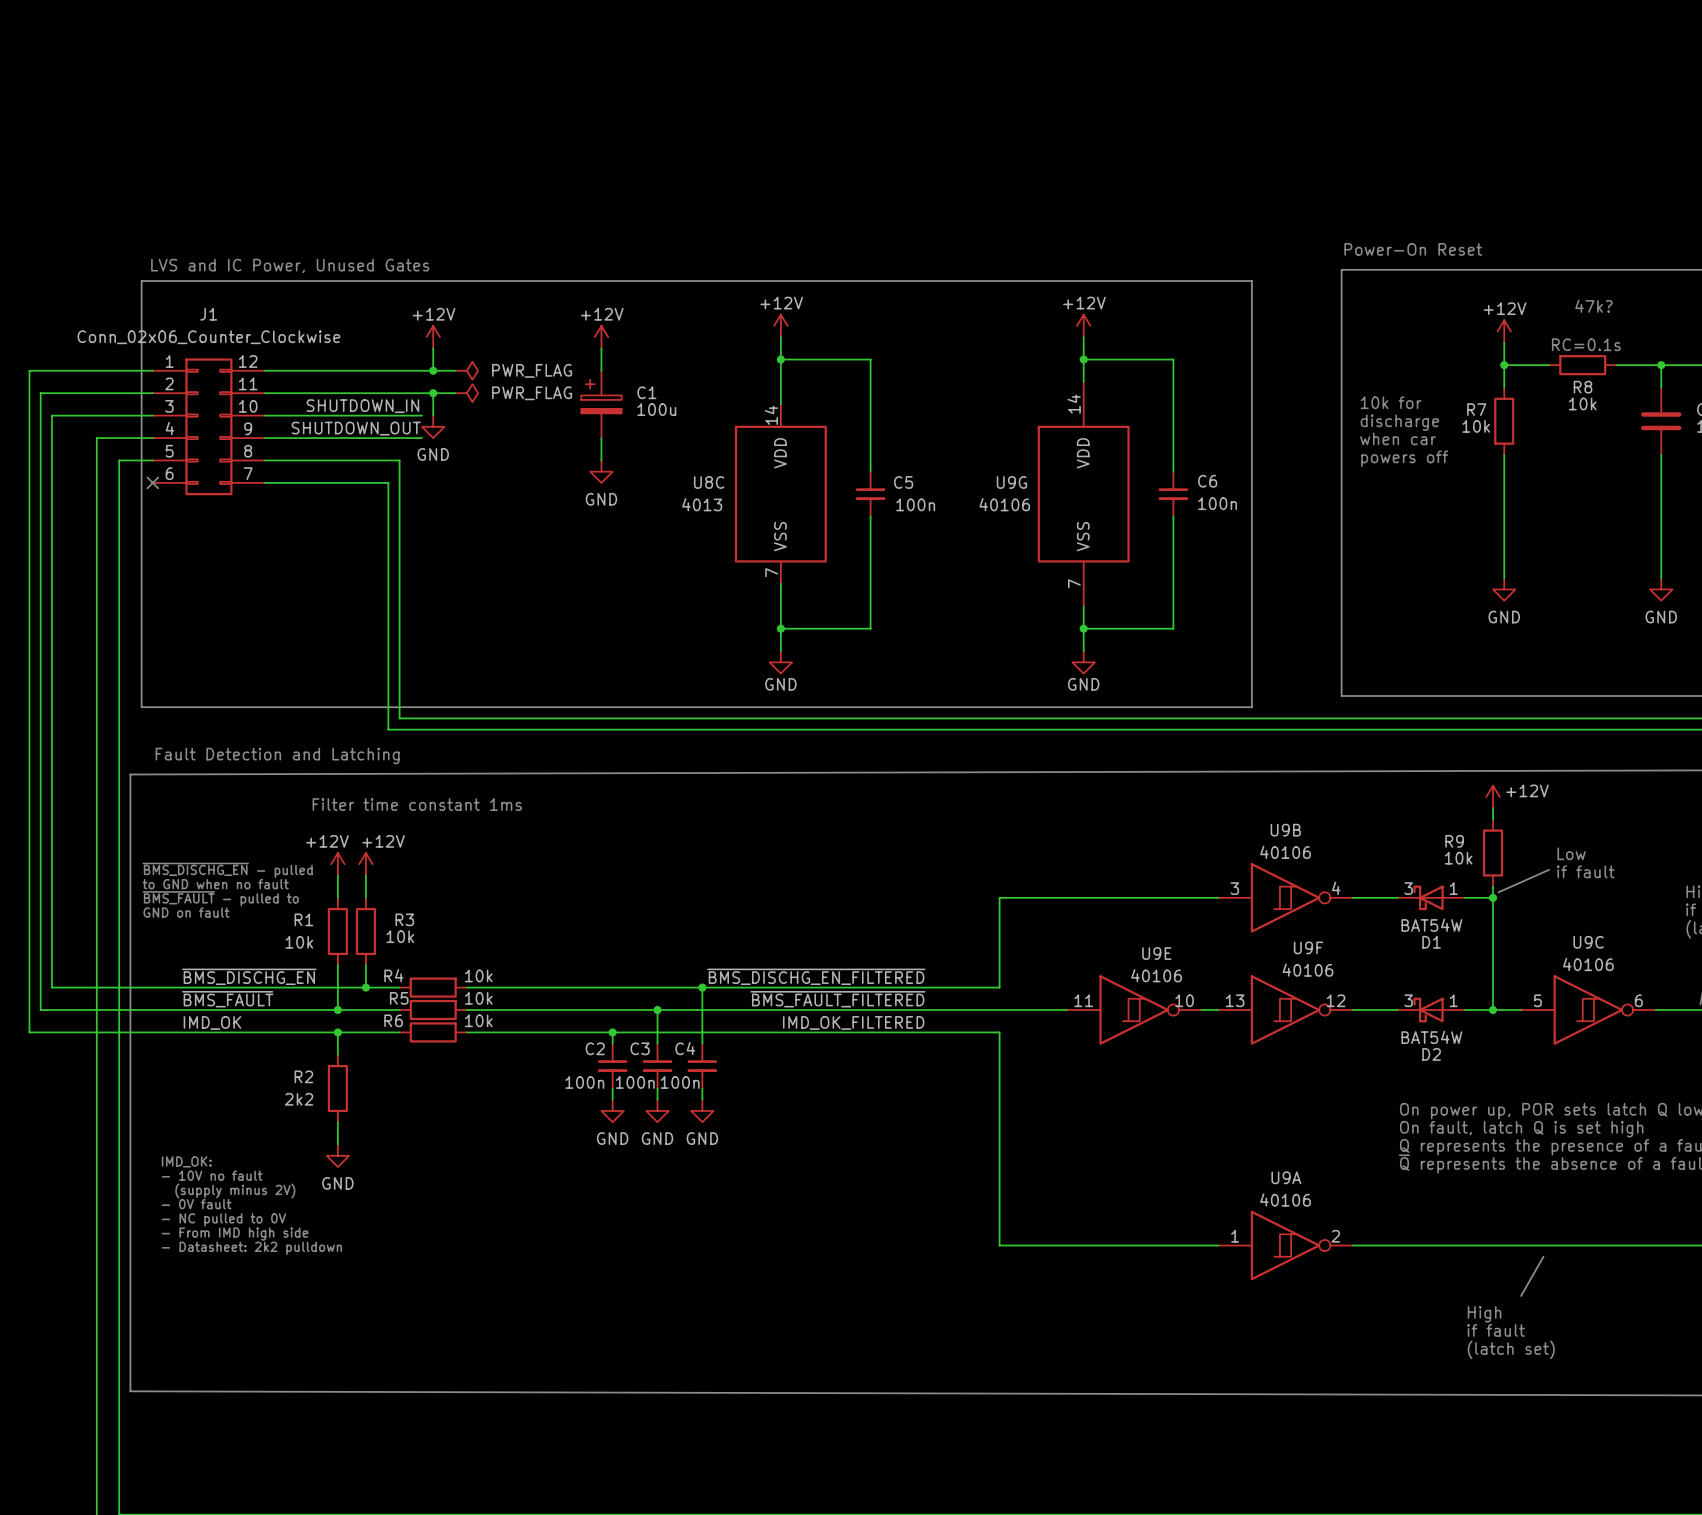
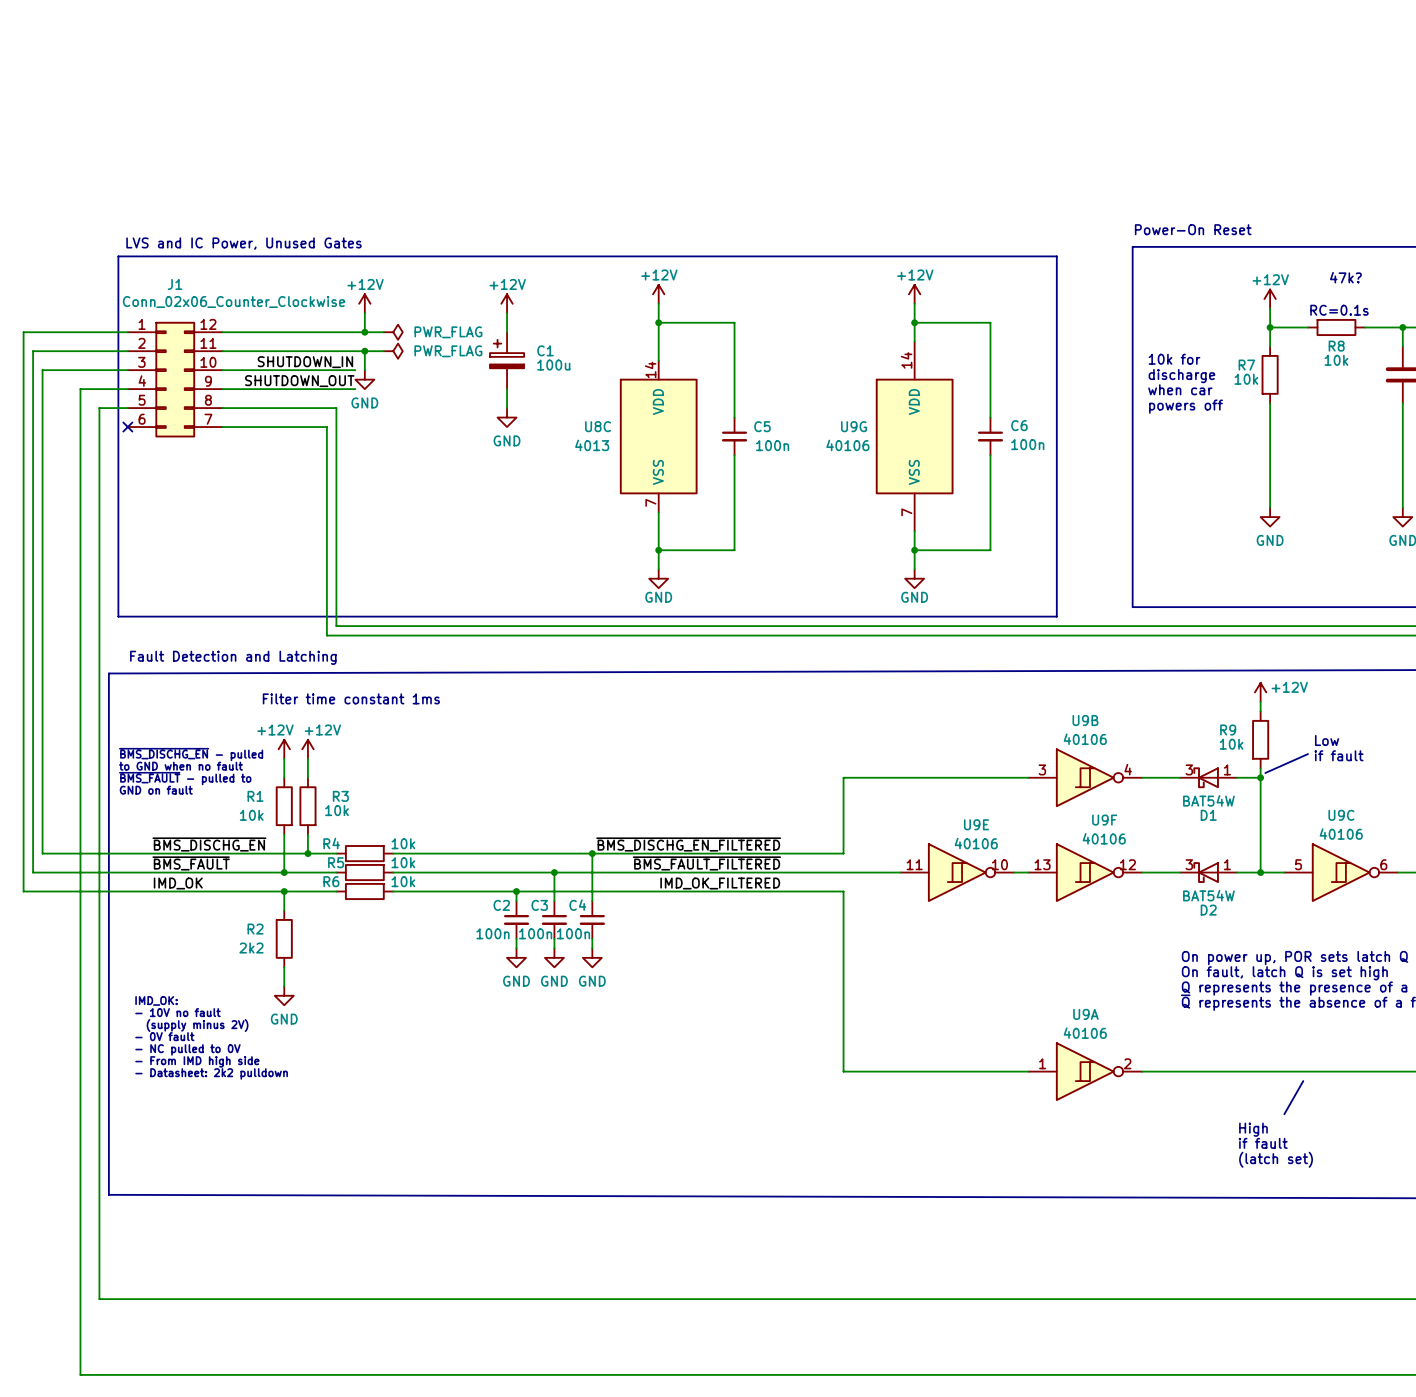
J1 value position: Conn_02x06_Counter_Clockwise (208, 337) -> Conn_02x06_Counter_Clockwise (234, 302)

